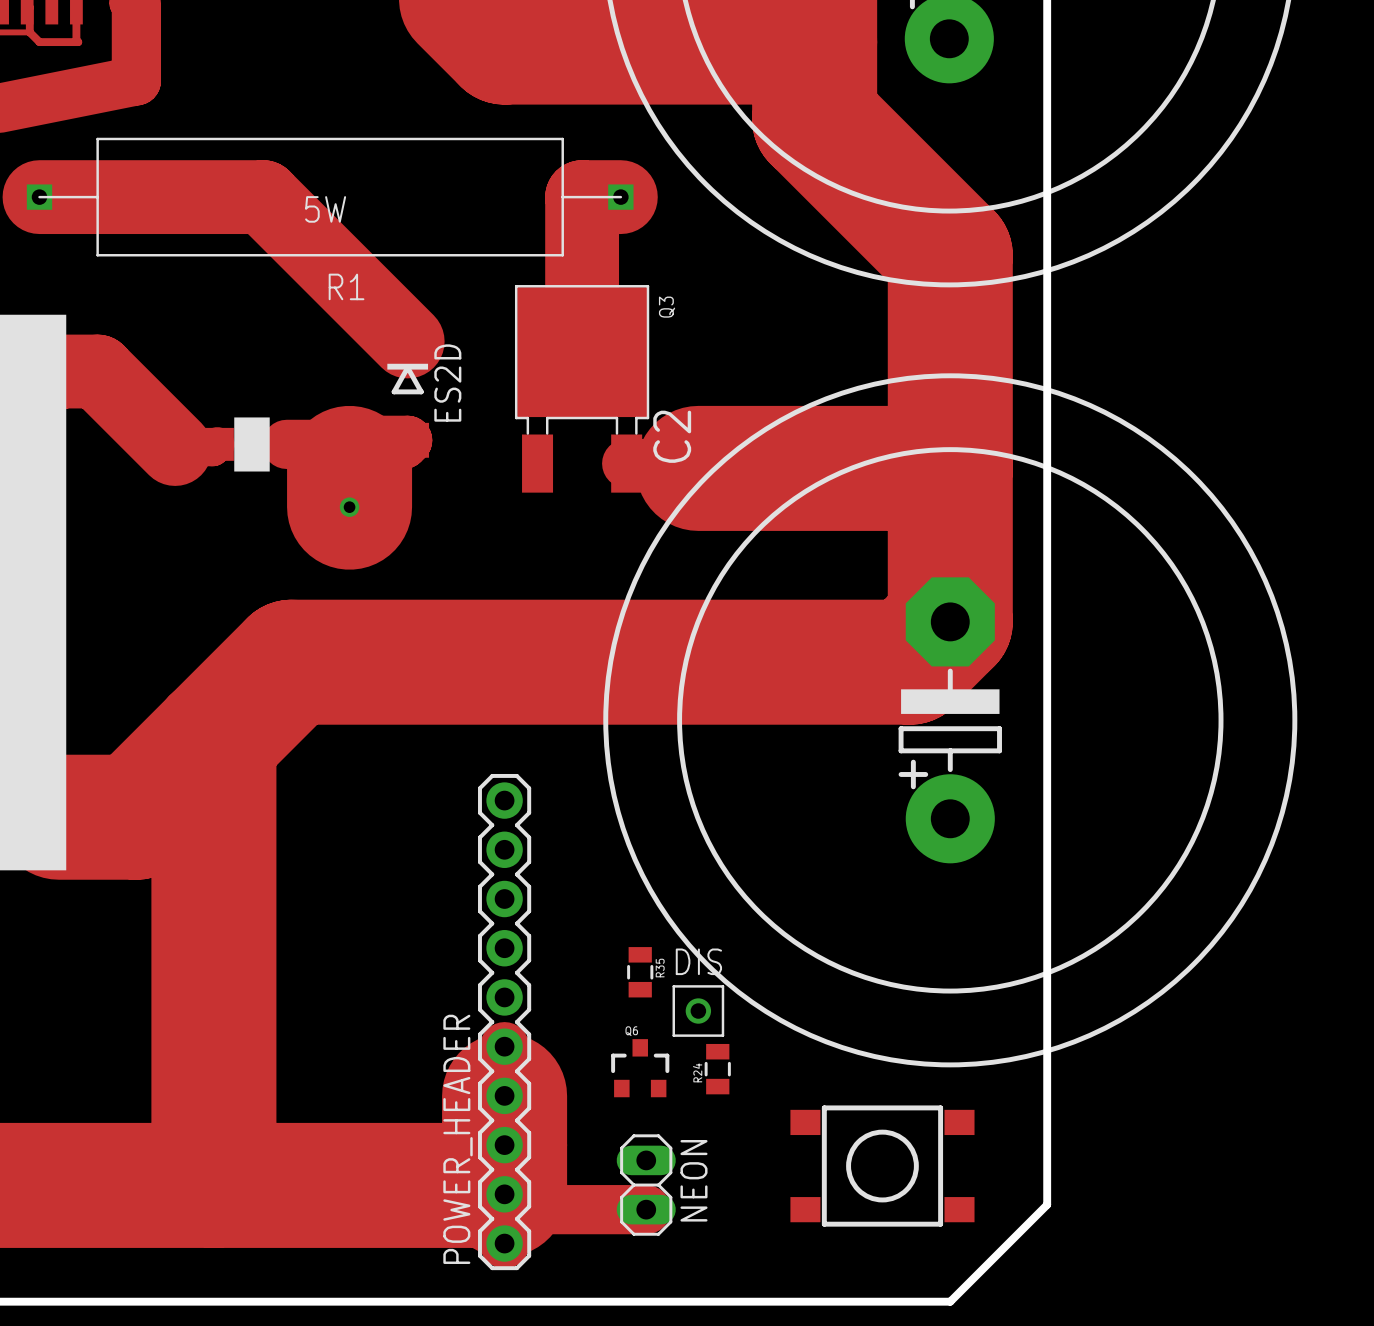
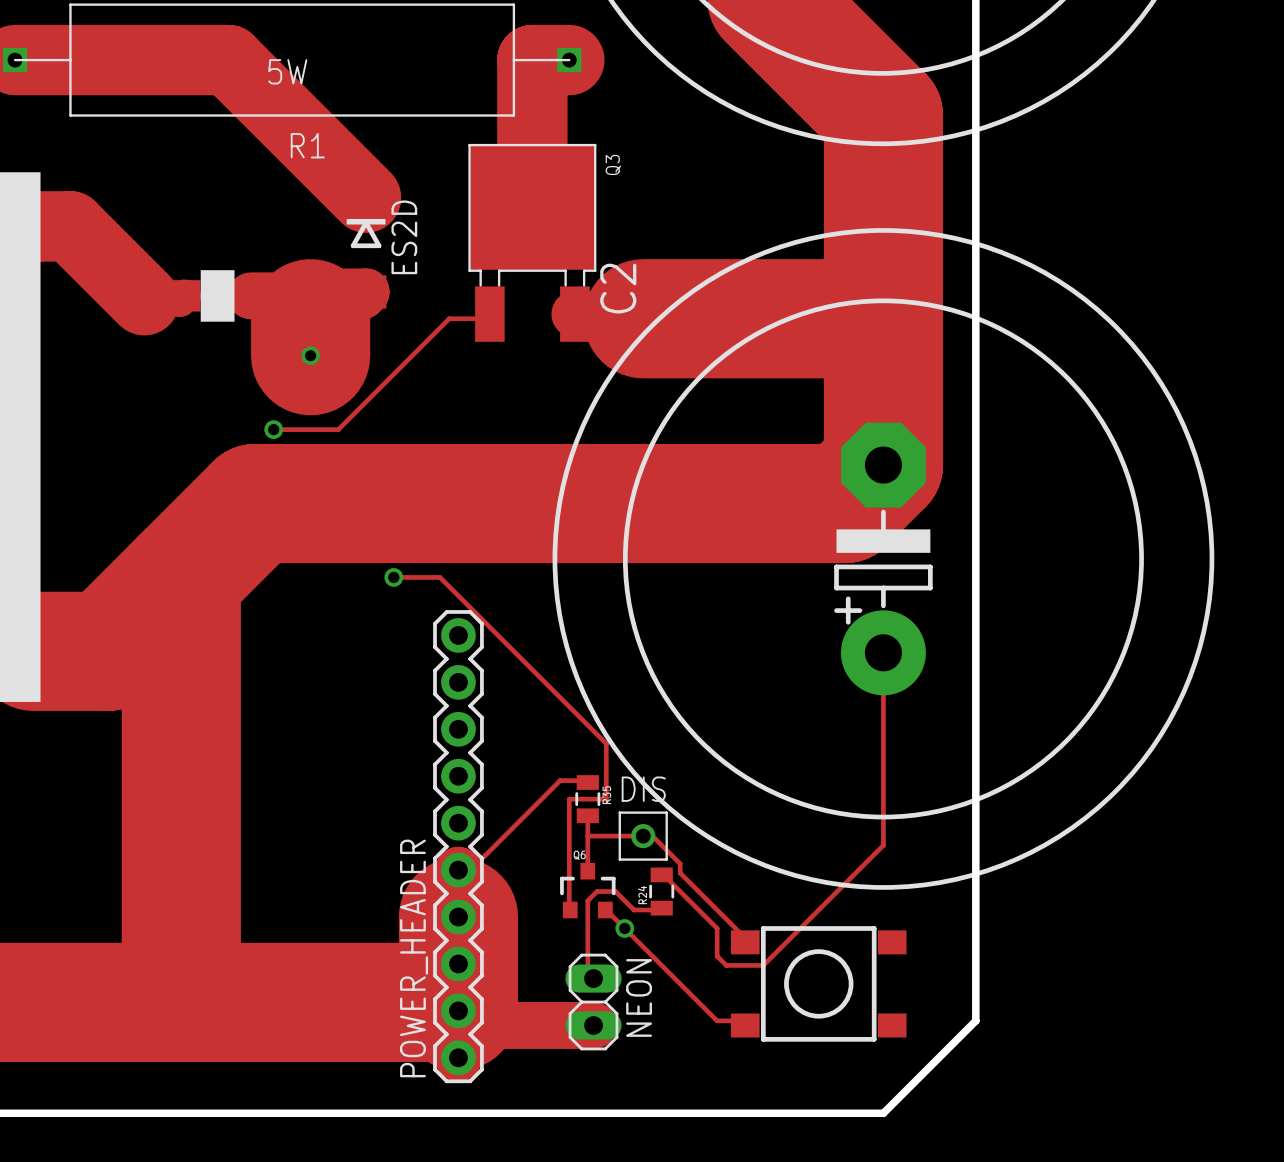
track: none -> (489, 314) (486, 318) (449, 318) (338, 429) (273, 429)
via: none -> (273, 429)
track: none -> (393, 577) (439, 577) (606, 743) (606, 799) (569, 799) (570, 910)
via: none -> (393, 577)
track: none -> (883, 652) (883, 845) (763, 965) (726, 965) (717, 956) (717, 928) (661, 873) (661, 874)
track: none -> (587, 782) (587, 780) (560, 780) (476, 863) (458, 917)
track: none -> (587, 815) (587, 871)
track: none -> (587, 836) (652, 836) (680, 863) (680, 873) (744, 937) (745, 942)
track: none -> (661, 908) (661, 910) (634, 910) (615, 891) (597, 891) (587, 900) (587, 974) (593, 978)
track: none -> (605, 910) (717, 1020) (744, 1020) (745, 1025)
via: none -> (624, 928)

